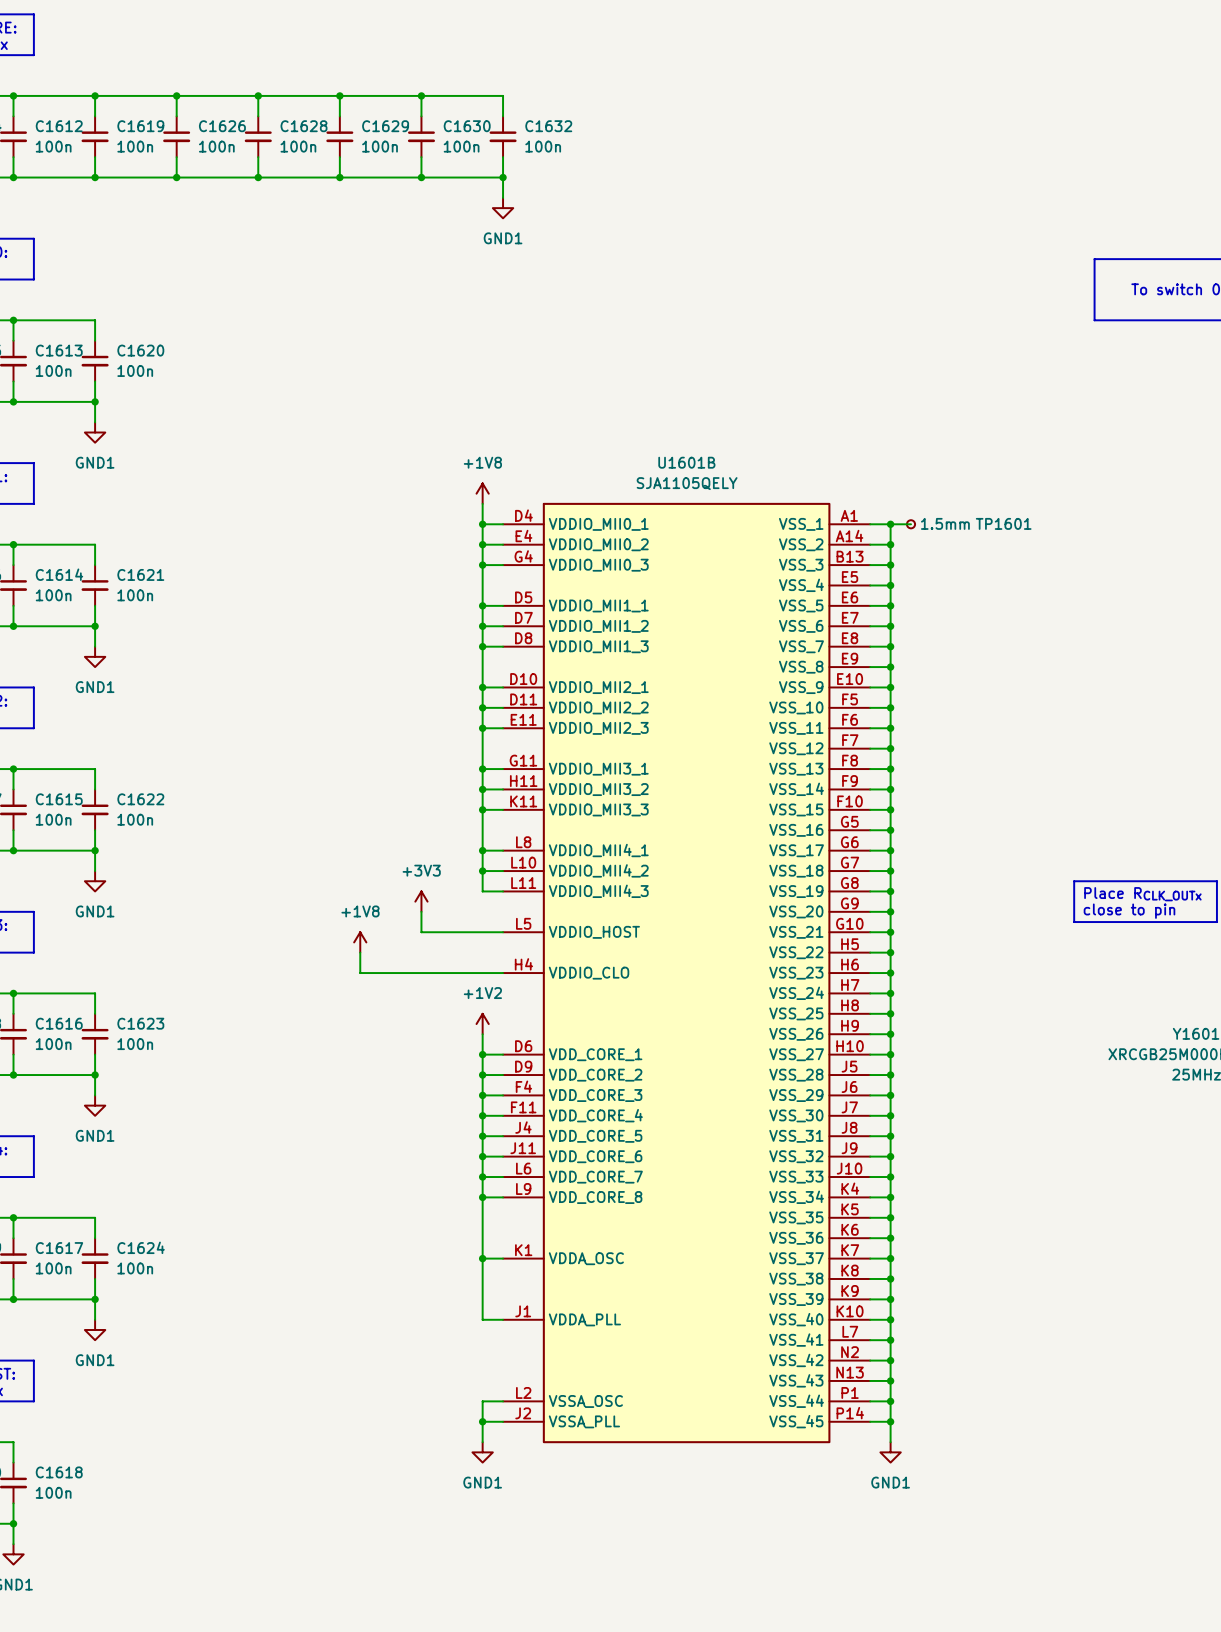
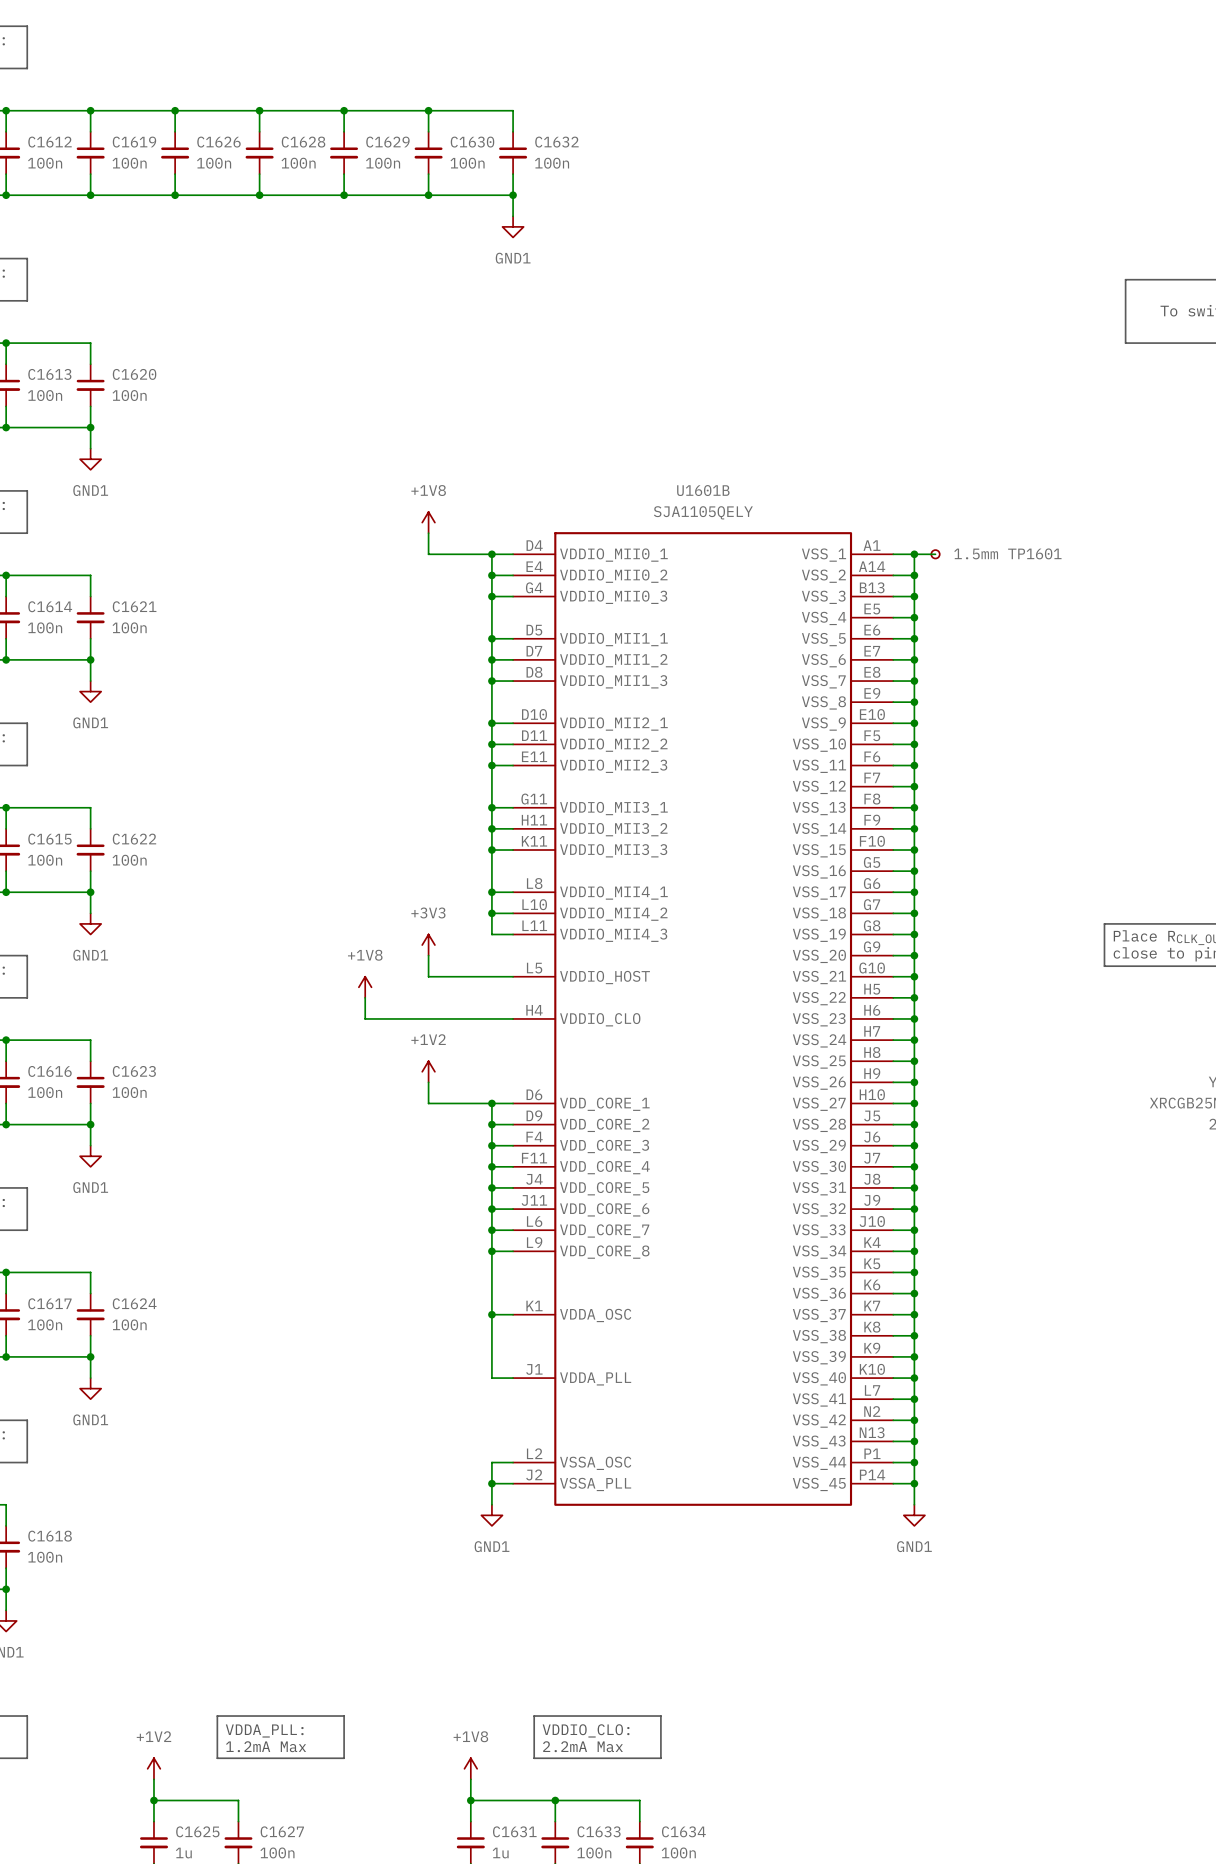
power symbol position: +1V8 (482, 493) -> +1V8 (428, 522)
wire: (482, 503) (482, 524) -> (428, 533) (428, 554) (491, 554)
power symbol position: +1V2 (482, 1024) -> +1V2 (428, 1071)
wire: (482, 1034) (482, 1054) -> (428, 1082) (428, 1103) (491, 1103)

